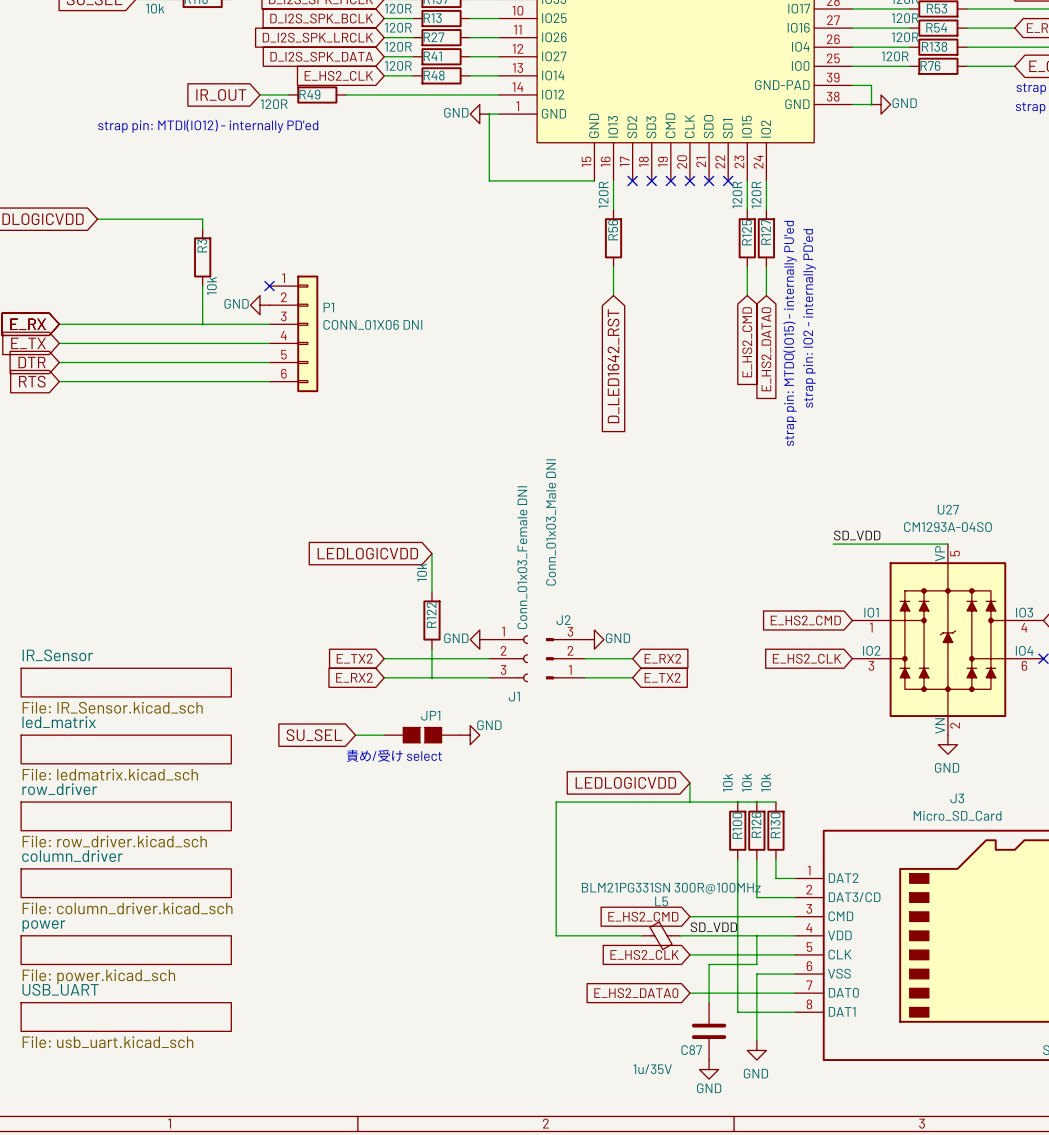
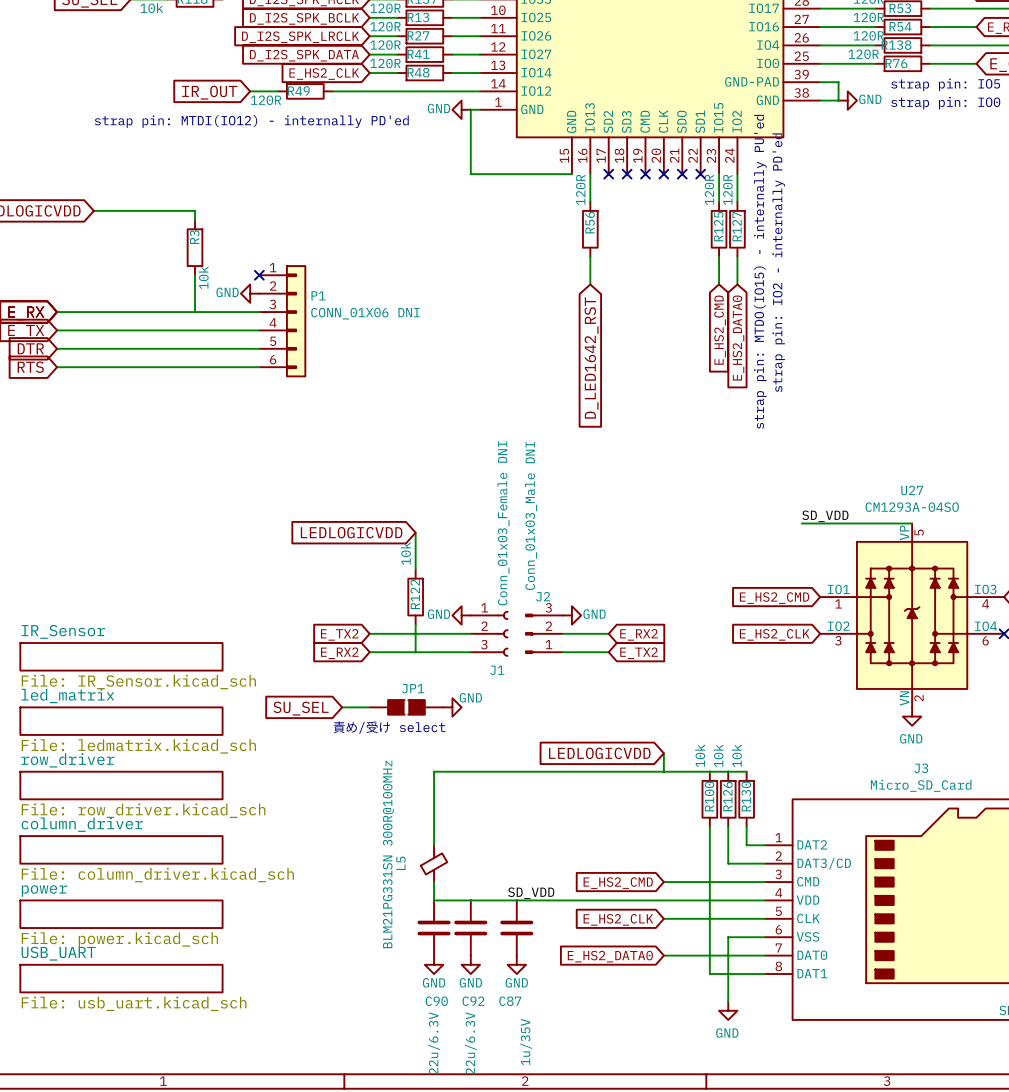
wire: (556, 802) (556, 935) -> (535, 771) (434, 771) (434, 845)
wire: none -> (434, 882) (434, 900) (535, 900)
label position: SD_VDD (713, 927) -> SD_VDD (531, 893)
L5 rotation: 0° (661, 935) -> 90° counterclockwise (434, 863)
L5 position: (661, 935) -> (434, 863)
wire: (756, 935) (756, 964) (709, 964) (709, 1002) -> none
C90: none -> 22u/6.3V (434, 928)
C92: none -> 22u/6.3V (470, 928)
power symbol: none -> GND (434, 964)
power symbol: none -> GND (470, 964)
power symbol: none -> GND (516, 964)
C87 position: (709, 1031) -> (516, 928)
C87 name position: C87 (691, 1050) -> C87 (510, 1001)
C87 value rotation: 0° (652, 1069) -> 90° counterclockwise (526, 1042)
C87 value position: 1u/35V (652, 1069) -> 1u/35V (526, 1042)
power symbol: GND (709, 1069) -> none

